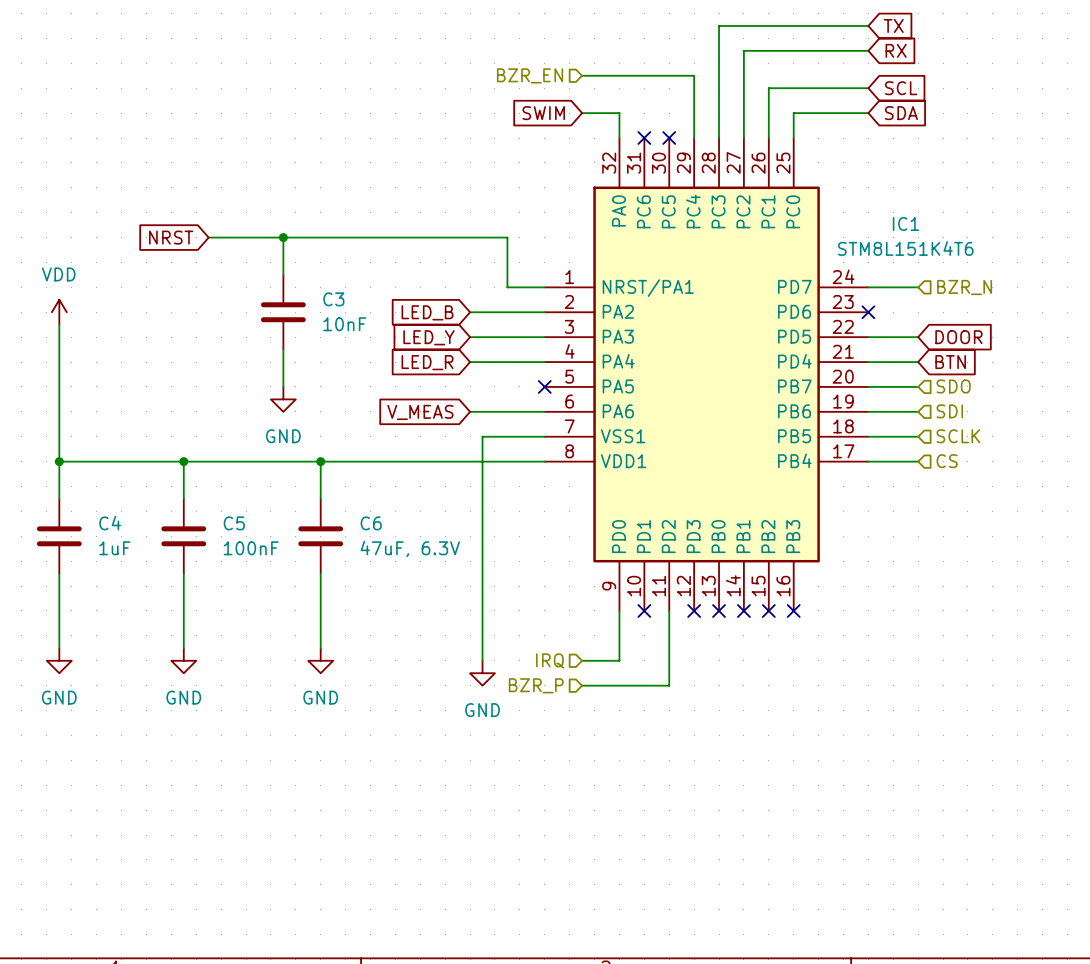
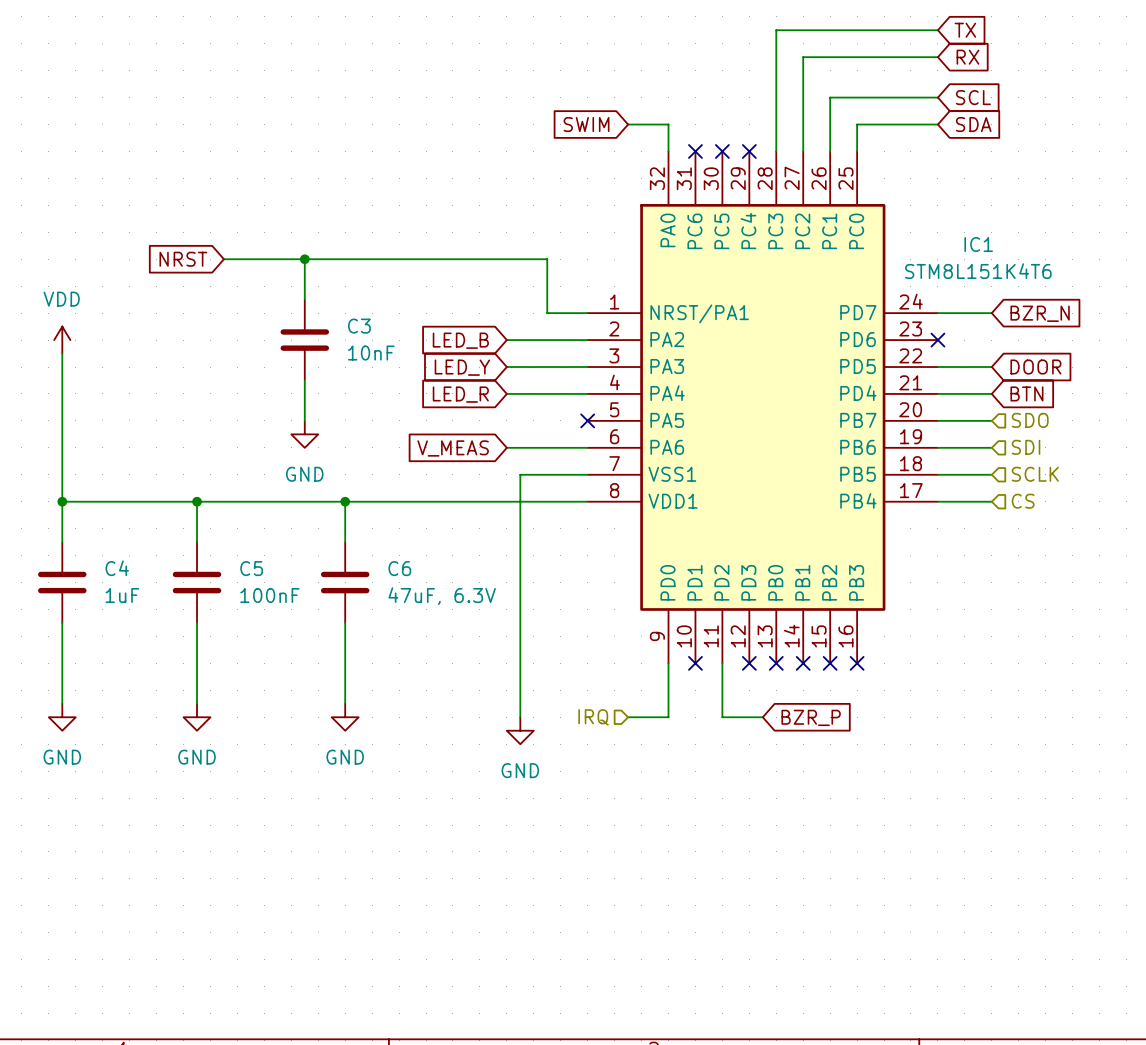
hierarchical label: BZR_EN (530, 75) -> none
wire: (582, 75) (694, 75) (694, 138) -> none
no-connect mark: none -> (749, 151)
global label: none -> BZR_N (1040, 313)
hierarchical label: BZR_N (964, 287) -> none
wire: (669, 660) (669, 685) (582, 685) -> (722, 717) (762, 717)
global label: none -> BZR_P (811, 717)
hierarchical label: BZR_P (536, 685) -> none

